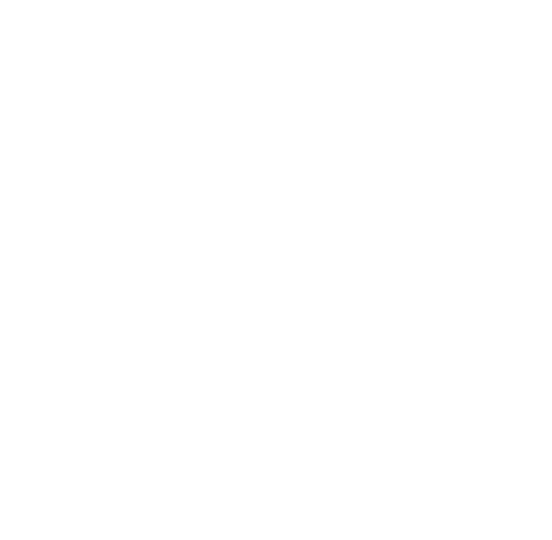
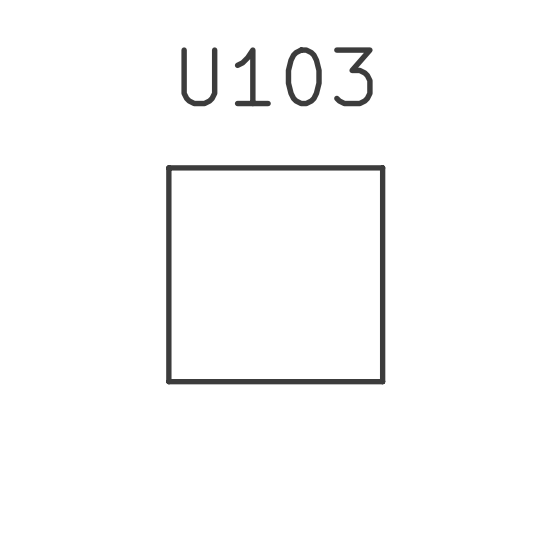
text: none -> U103 (277, 76)
line: none -> (168, 167) (382, 167) (382, 381) (168, 381) (168, 167)

